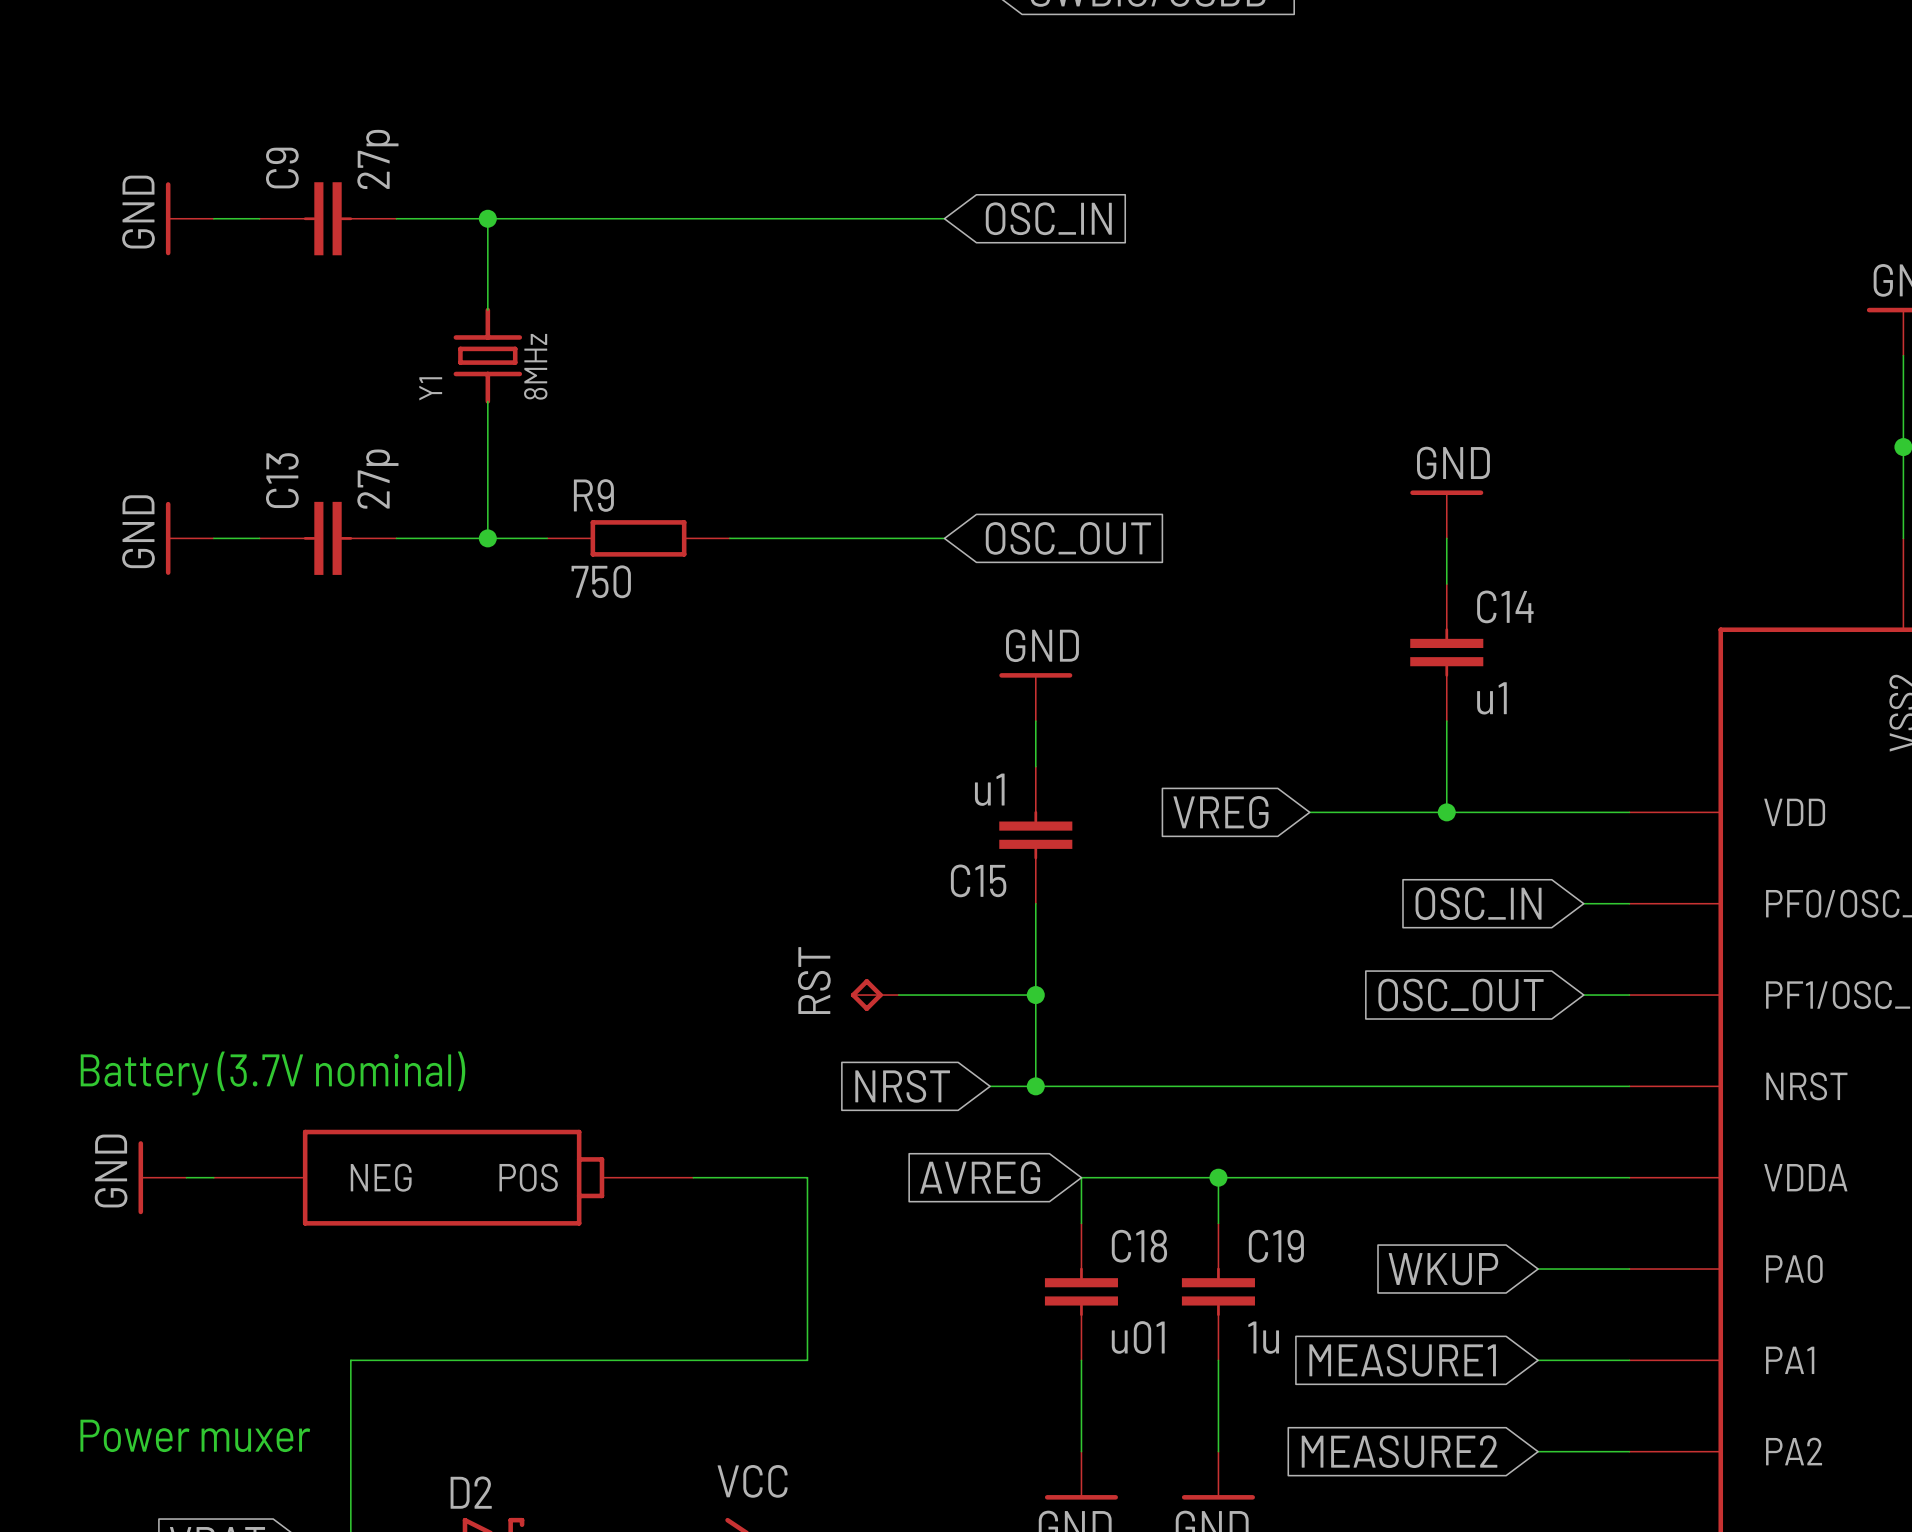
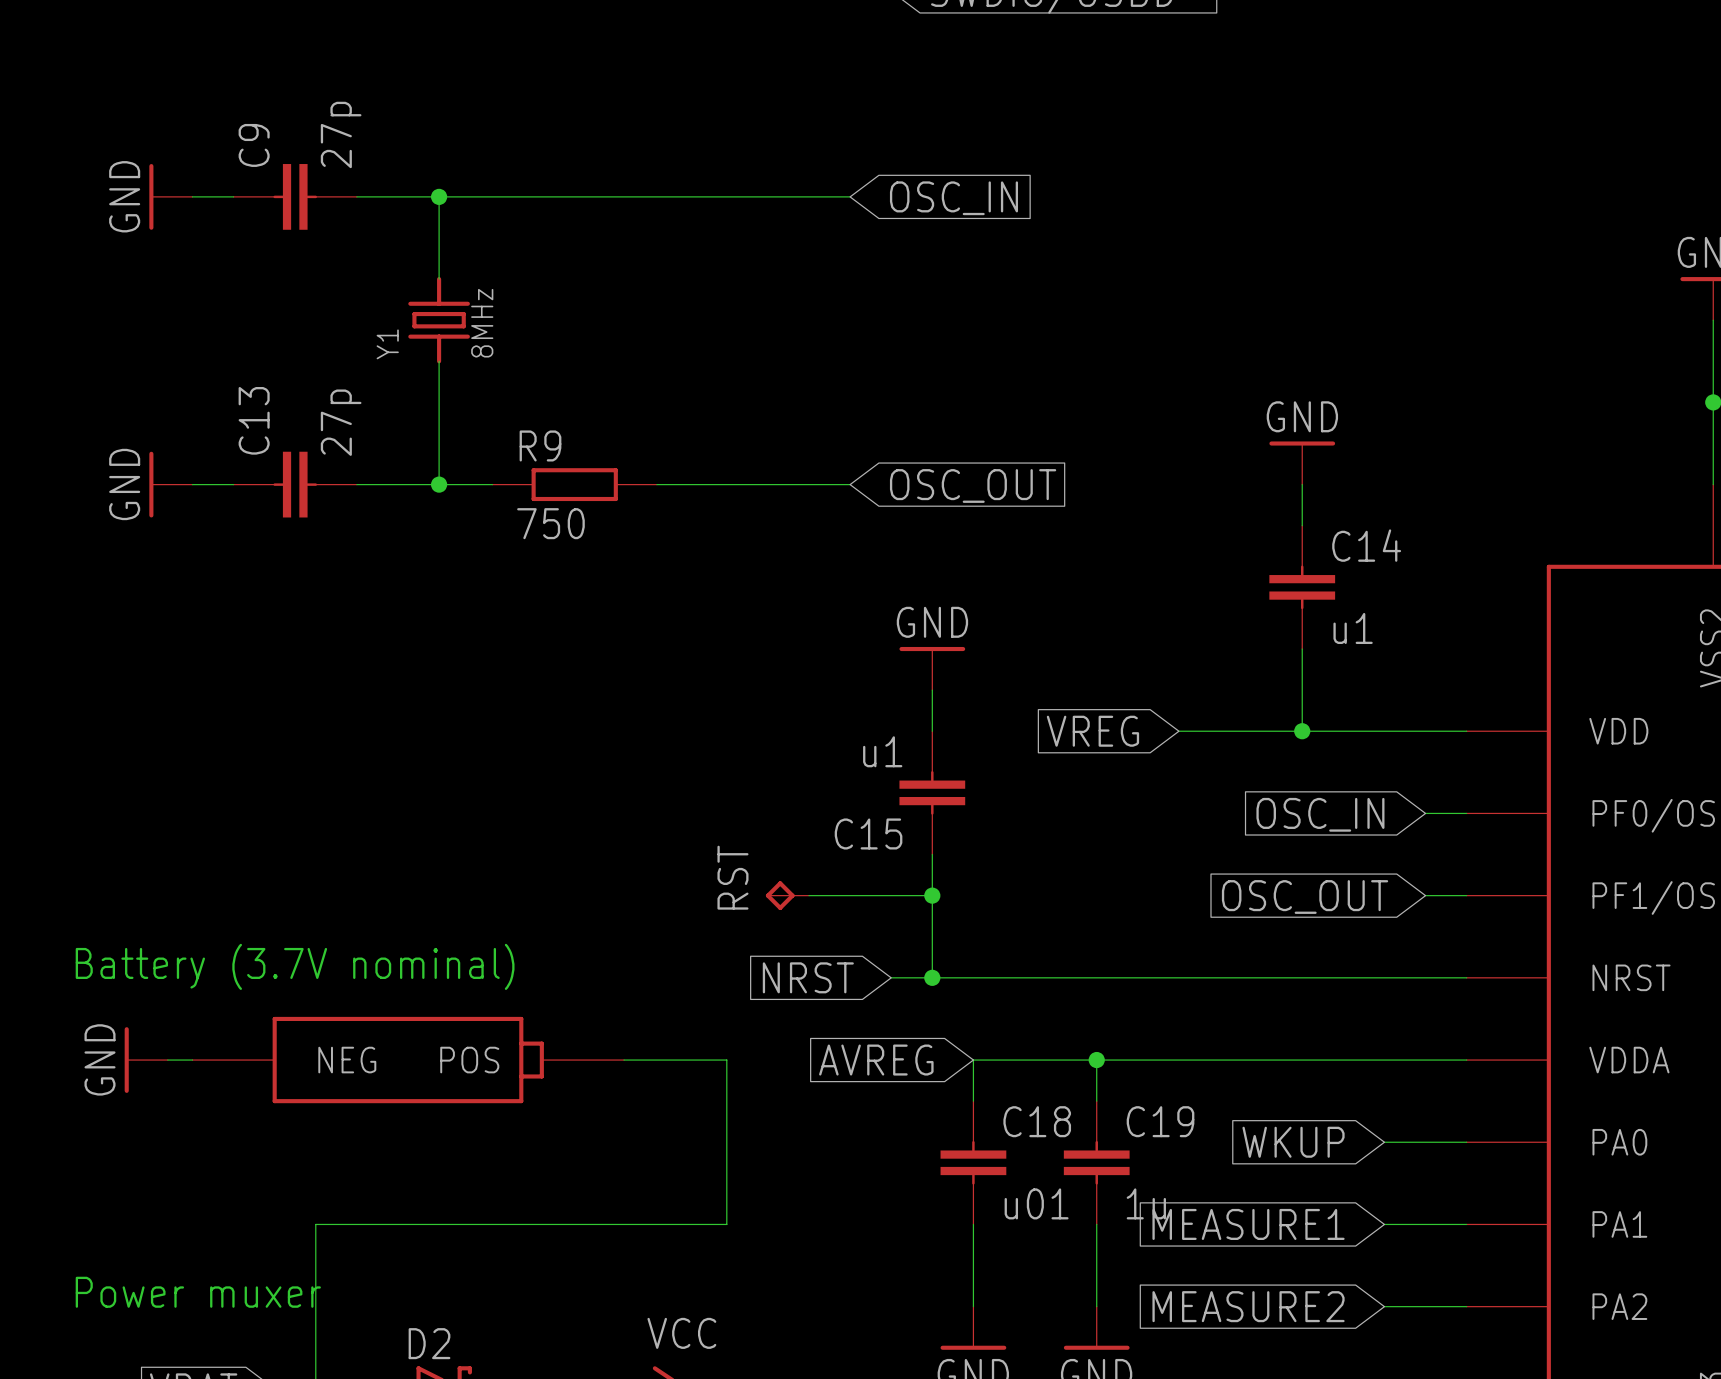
power symbol position: GND (1035, 697) -> GND (932, 668)
C15 position: (1035, 835) -> (932, 792)

